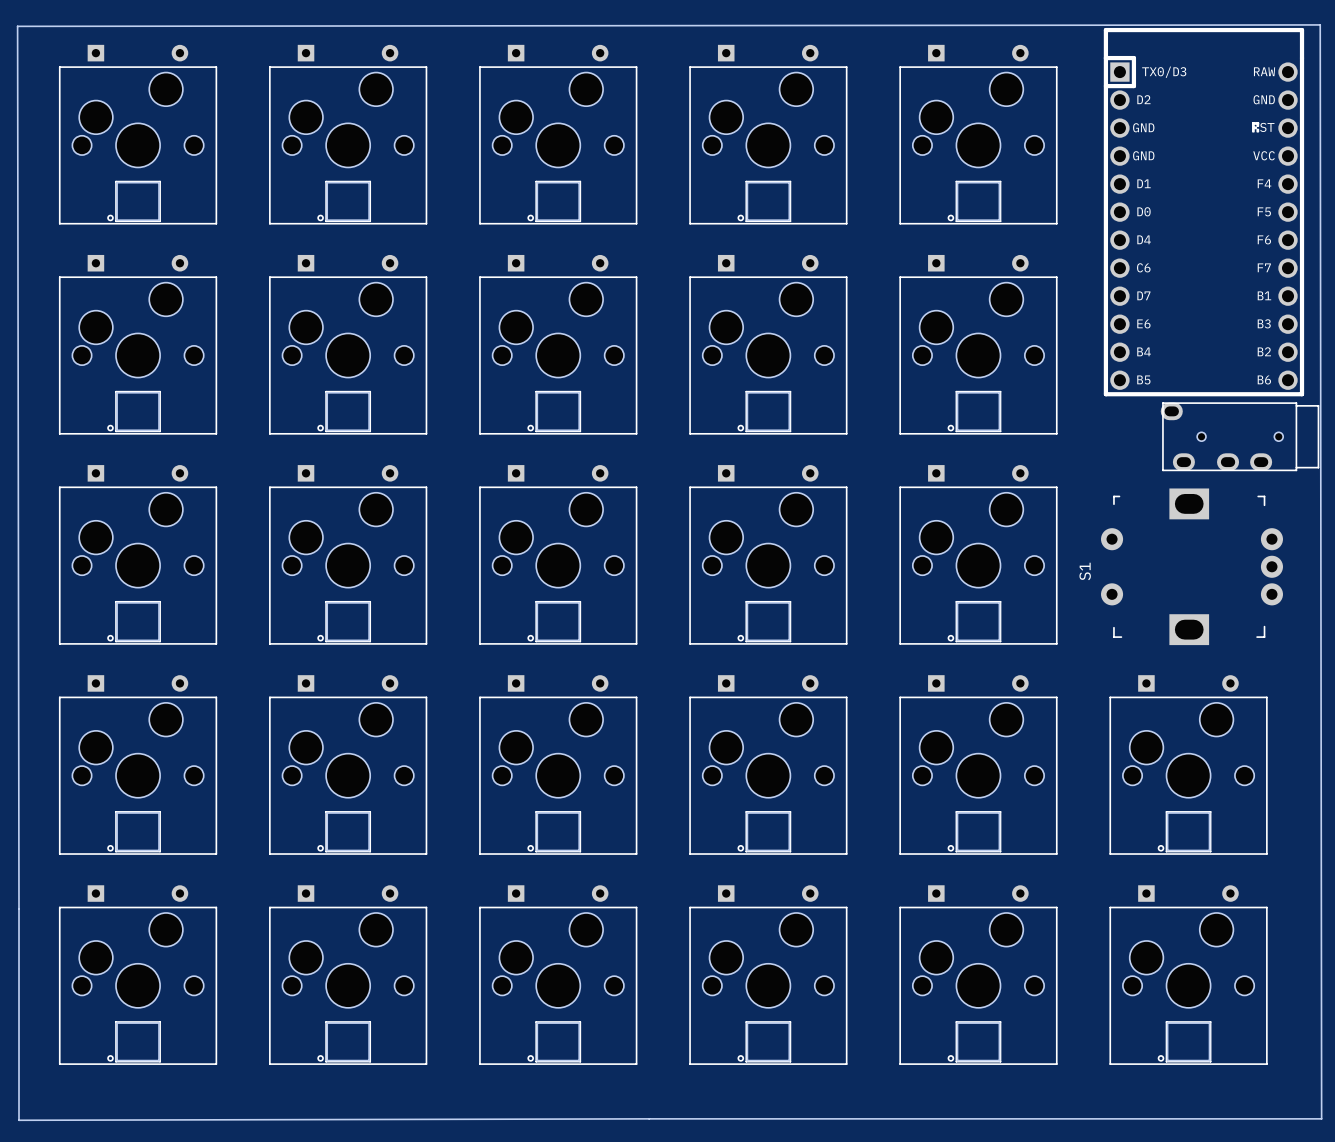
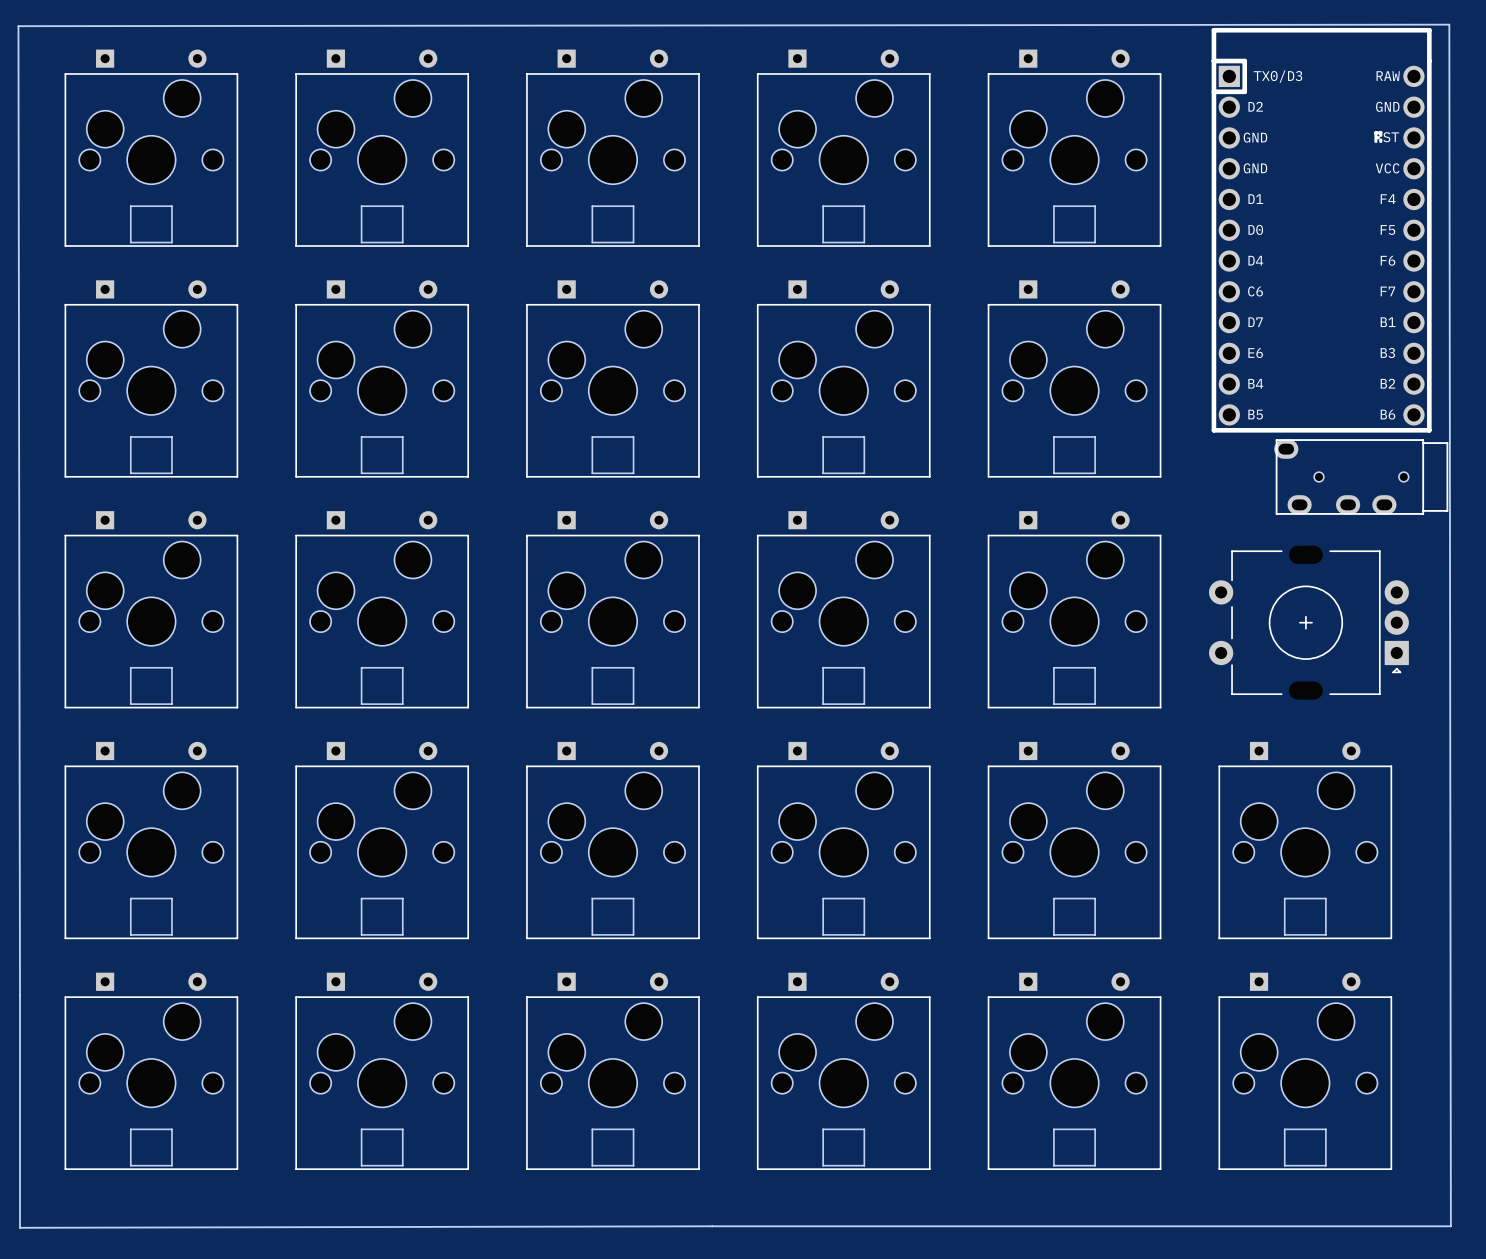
part footprint: [59, 44, 218, 225] -> [64, 49, 239, 247]
part footprint: [269, 44, 428, 225] -> [295, 49, 469, 247]
part footprint: [479, 44, 638, 225] -> [526, 49, 700, 247]
part footprint: [689, 44, 848, 225] -> [757, 49, 931, 247]
part footprint: [899, 44, 1058, 225] -> [987, 49, 1162, 247]
part footprint: [59, 254, 218, 435] -> [64, 280, 239, 478]
part footprint: [269, 254, 428, 435] -> [295, 280, 469, 478]
part footprint: [479, 254, 638, 435] -> [526, 280, 700, 478]
part footprint: [689, 254, 848, 435] -> [757, 280, 931, 478]
part footprint: [899, 254, 1058, 435] -> [987, 280, 1162, 478]
part footprint: [59, 465, 218, 645] -> [64, 511, 239, 709]
part footprint: [269, 465, 428, 645] -> [295, 511, 469, 709]
part footprint: [479, 465, 638, 645] -> [526, 511, 700, 709]
part footprint: [689, 465, 848, 645] -> [757, 511, 931, 709]
part footprint: [899, 465, 1058, 645] -> [987, 511, 1162, 709]
S1: (1192, 566) -> none
part: none -> (1308, 622)
part footprint: [59, 675, 218, 855] -> [64, 741, 239, 940]
part footprint: [269, 675, 428, 855] -> [295, 741, 469, 940]
part footprint: [479, 675, 638, 855] -> [526, 741, 700, 940]
part footprint: [689, 675, 848, 855] -> [757, 741, 931, 940]
part footprint: [899, 675, 1058, 855] -> [987, 741, 1162, 940]
part footprint: [1109, 675, 1268, 855] -> [1218, 741, 1393, 940]
part footprint: [59, 885, 218, 1065] -> [64, 972, 239, 1170]
part footprint: [269, 885, 428, 1065] -> [295, 972, 469, 1170]
part footprint: [479, 885, 638, 1065] -> [526, 972, 700, 1170]
part footprint: [689, 885, 848, 1065] -> [757, 972, 931, 1170]
part footprint: [899, 885, 1058, 1065] -> [987, 972, 1162, 1170]
part footprint: [1109, 885, 1268, 1065] -> [1218, 972, 1393, 1170]

